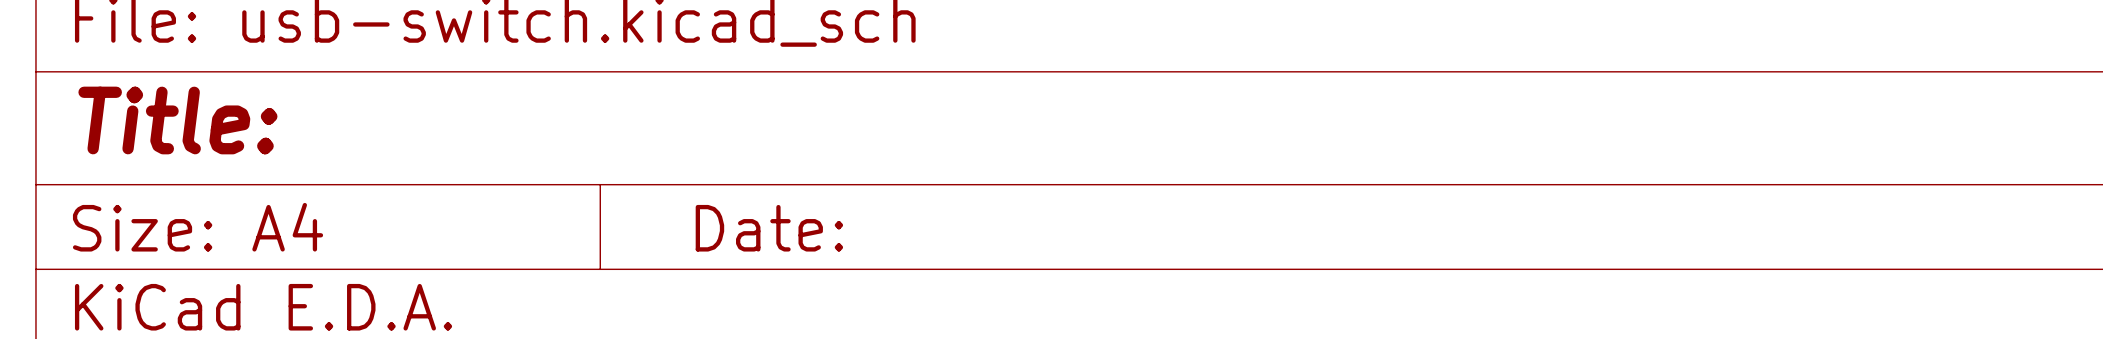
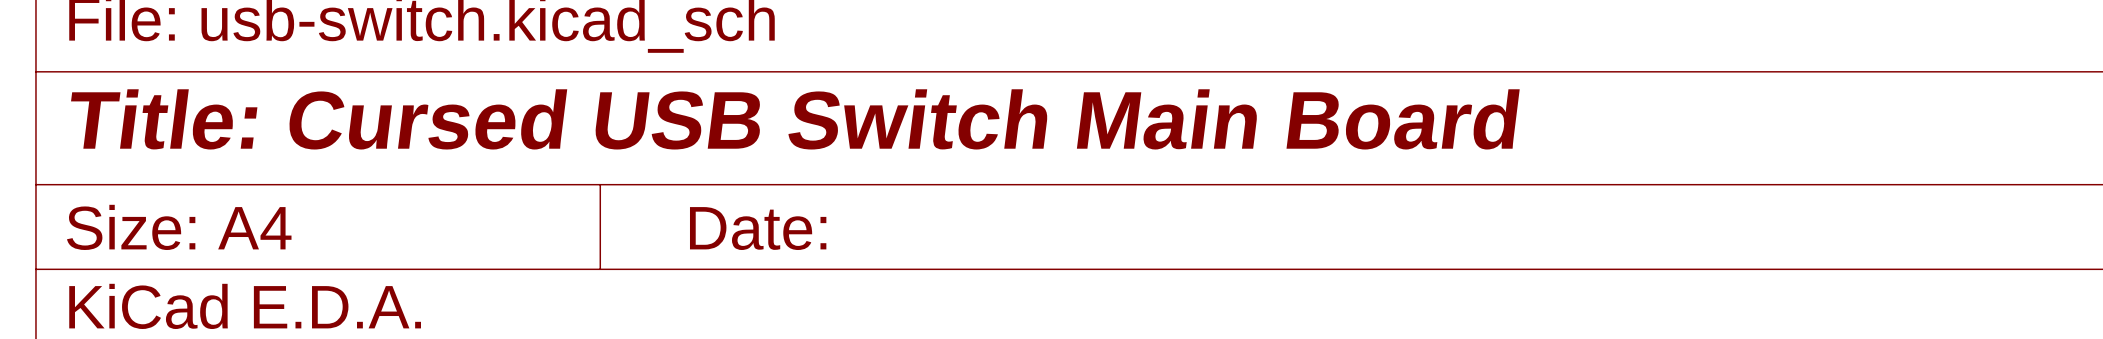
title block: Title: (177, 120) -> Title: Cursed USB Switch Main Board (795, 119)

